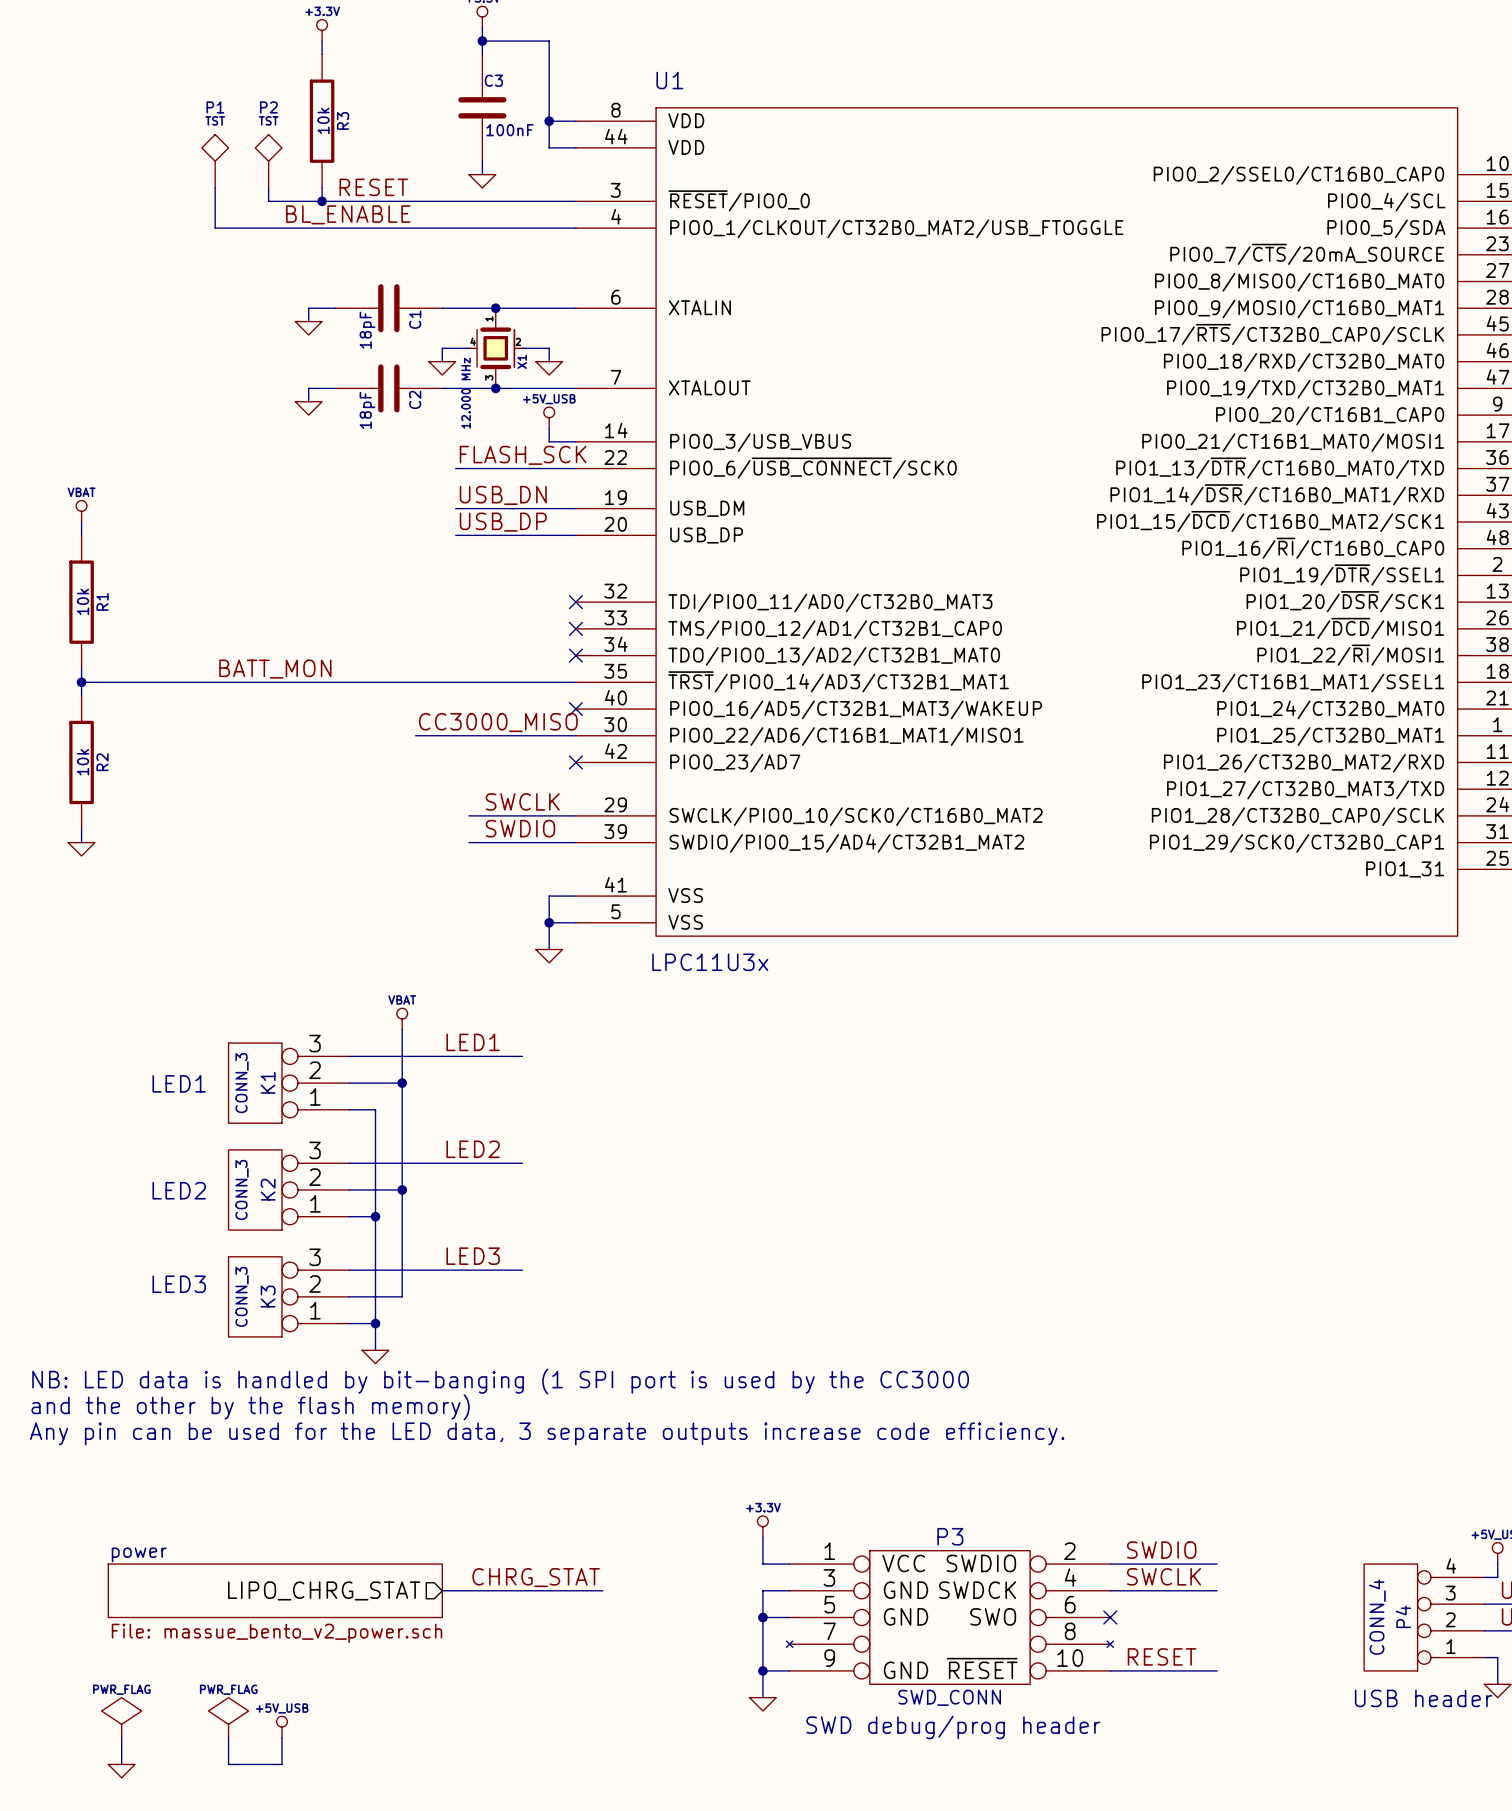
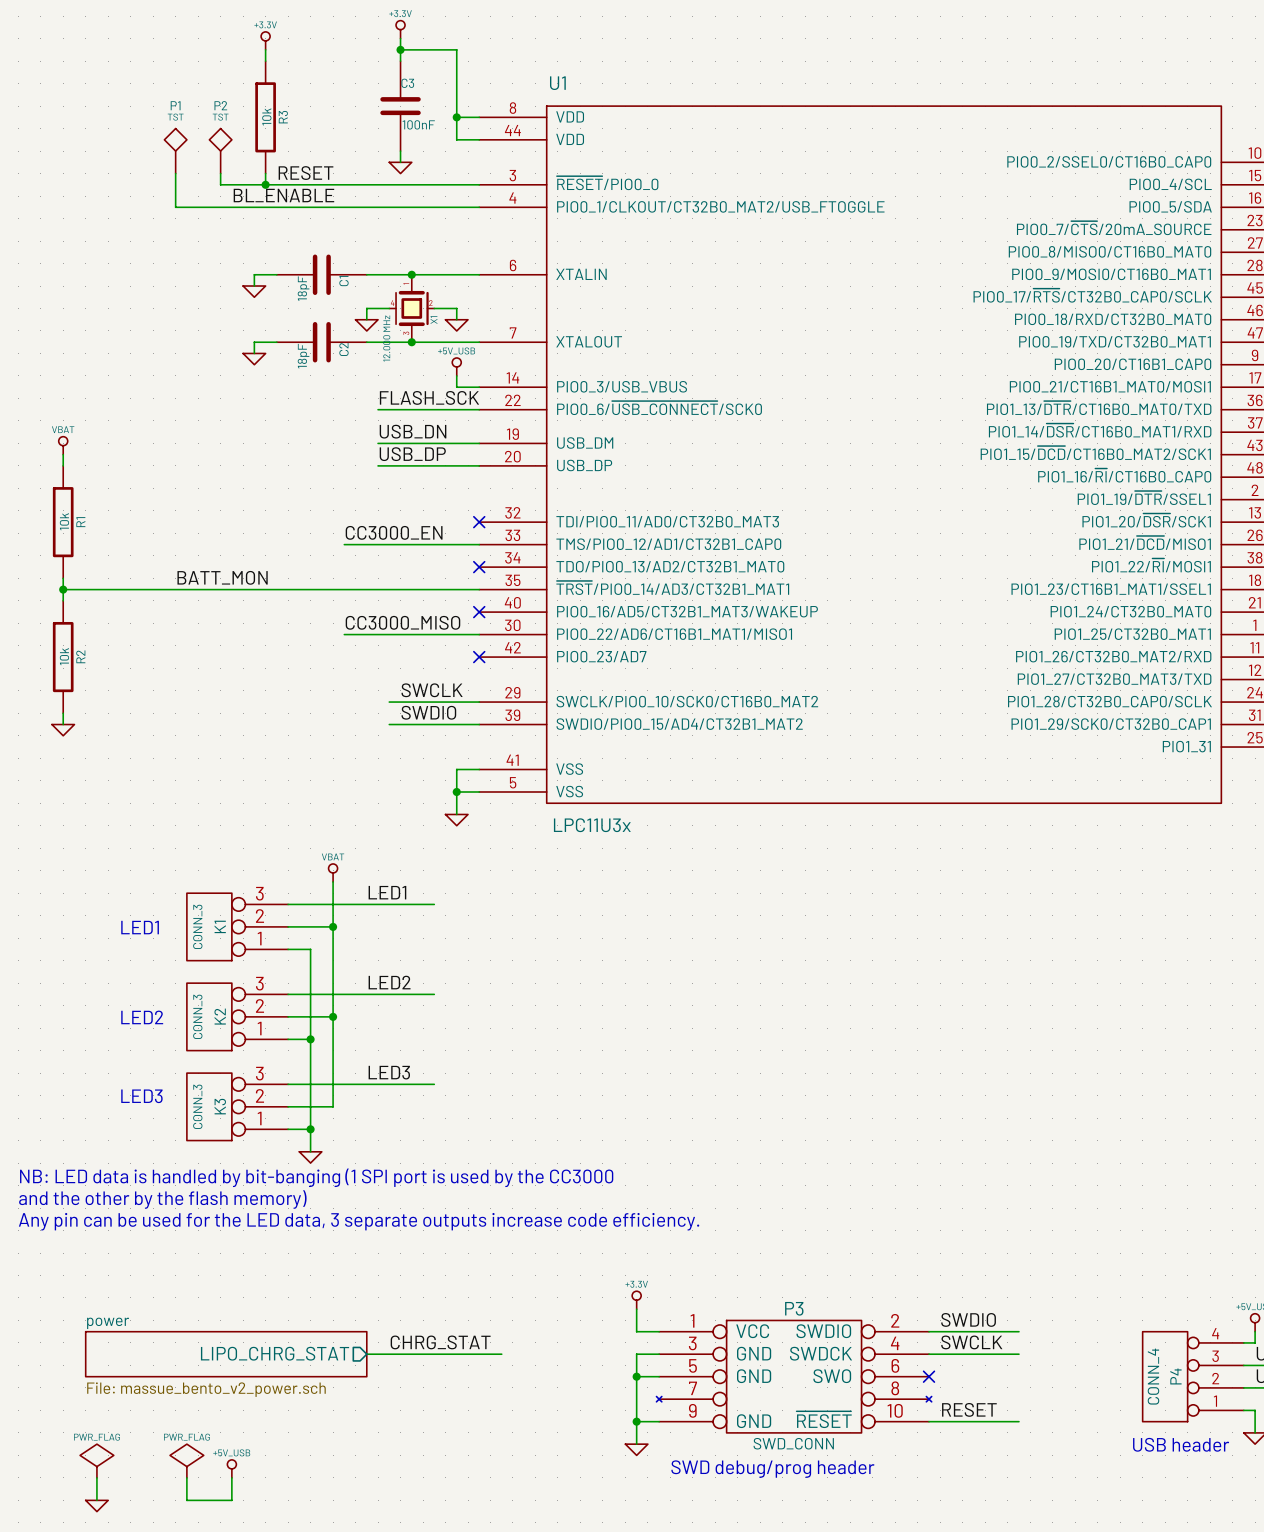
label: none -> CC3000_EN (394, 532)
wire: none -> (344, 544) (479, 544)
no-connect mark: (575, 628) -> none

